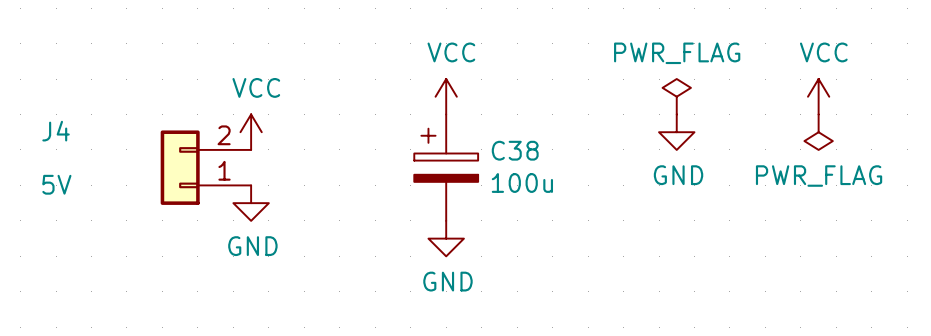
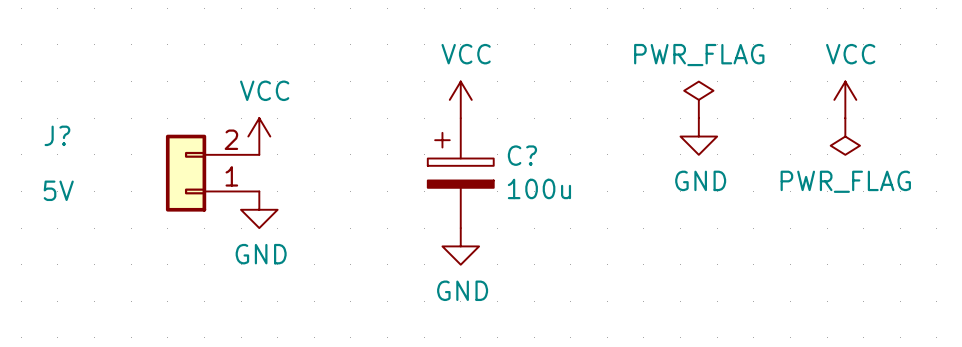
J4 name: J4 (56, 131) -> J? (57, 135)
C38 name: C38 (515, 150) -> C? (522, 155)

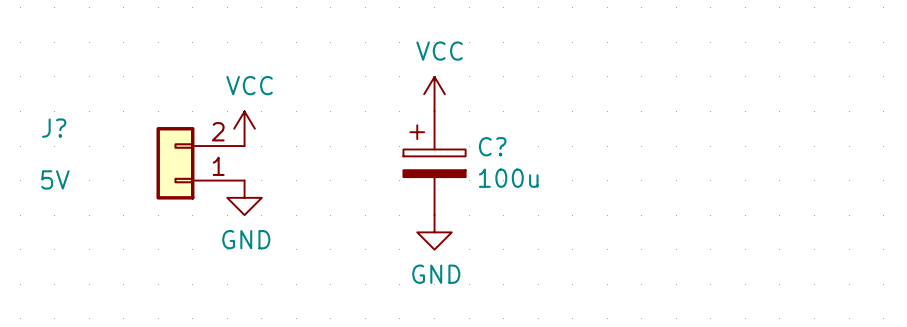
power symbol: PWR_FLAG (698, 99) -> none
power symbol: VCC (845, 99) -> none
power symbol: GND (698, 136) -> none
power symbol: PWR_FLAG (845, 136) -> none

